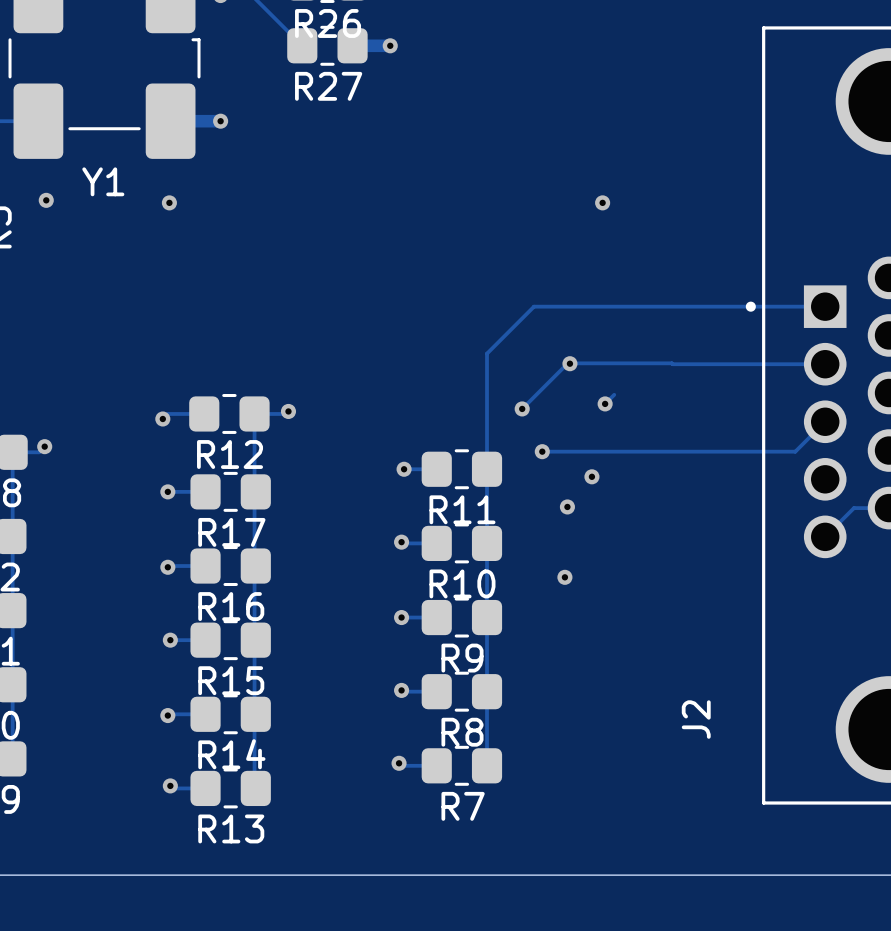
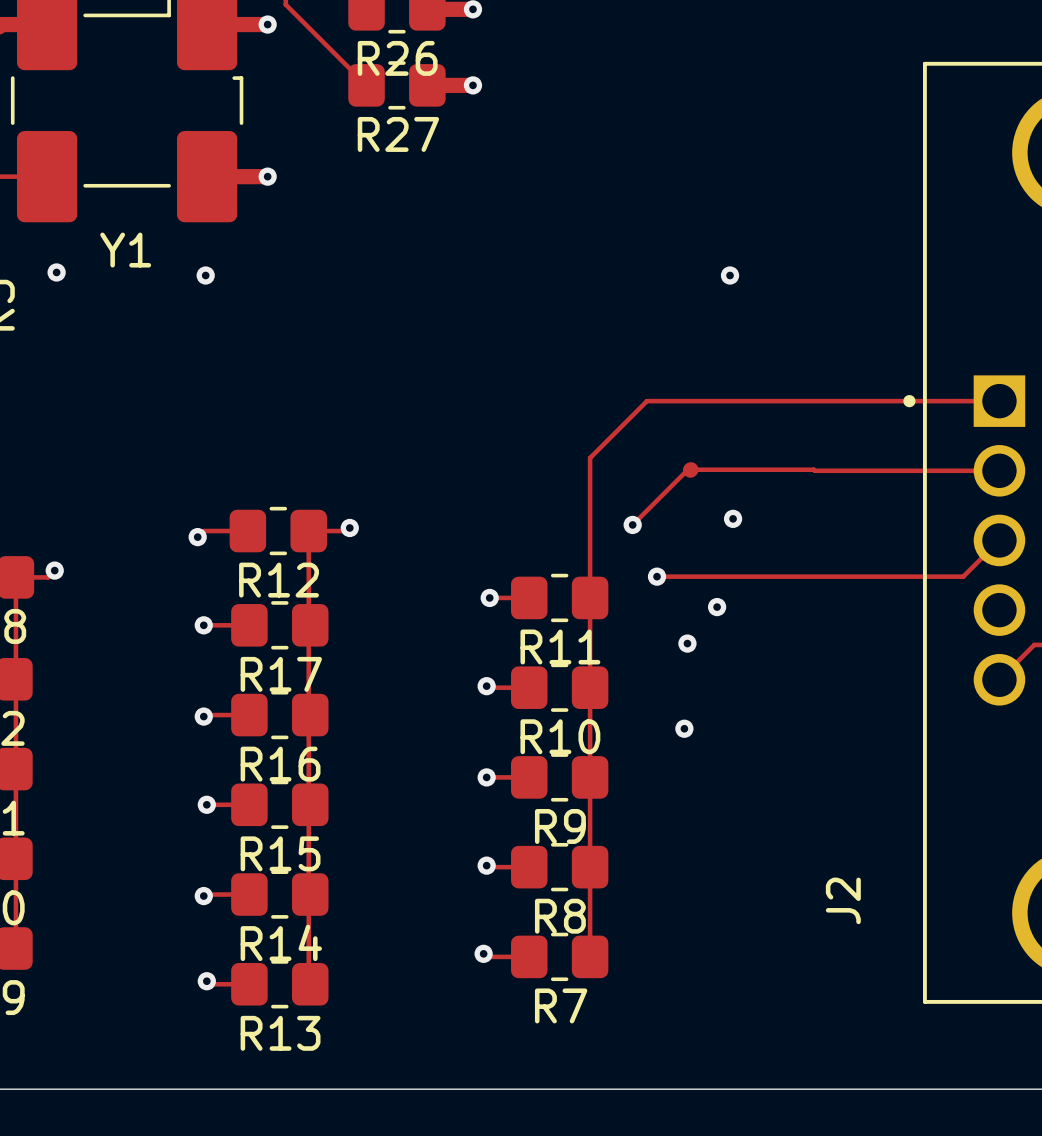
via: (569, 363) -> none
track: (614, 394) (605, 403) -> none

